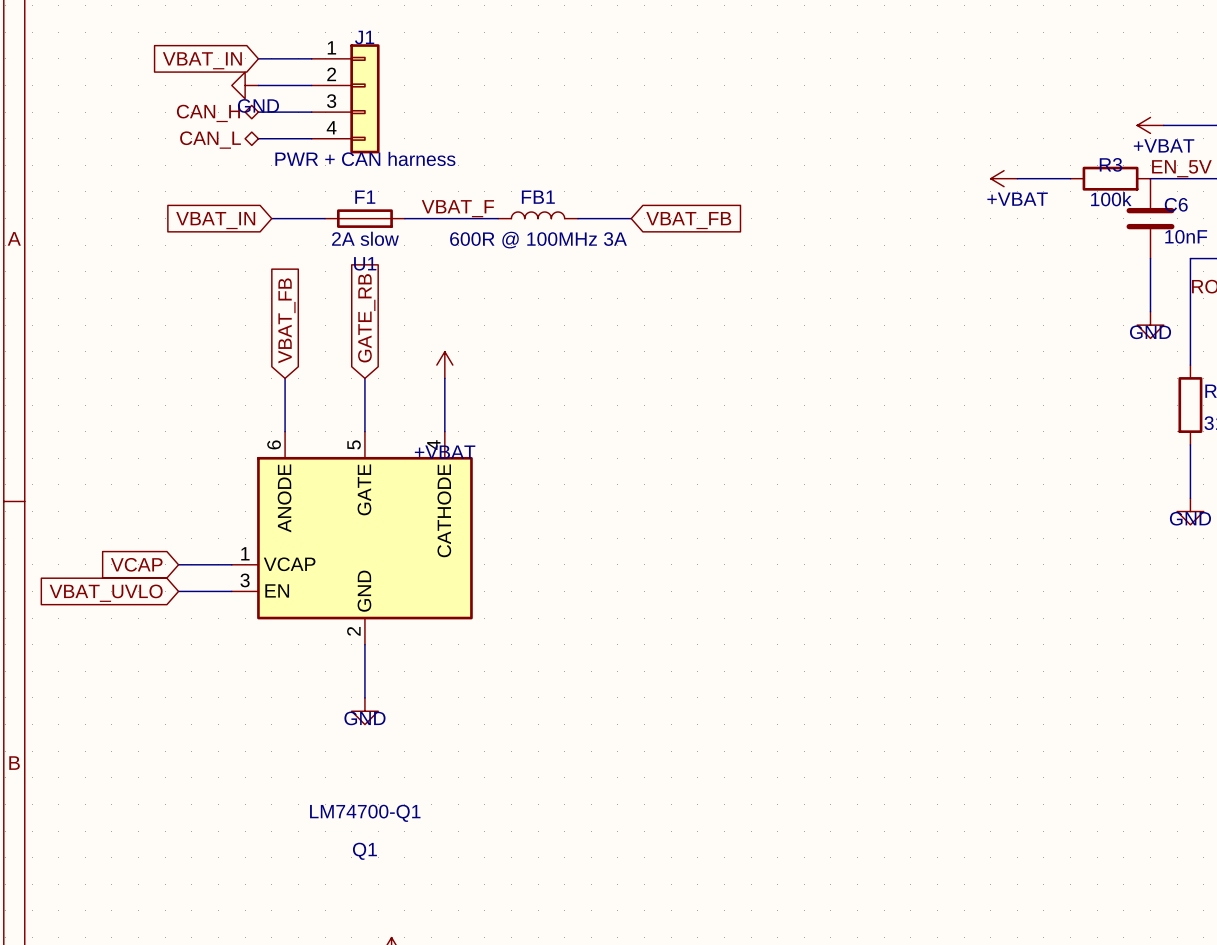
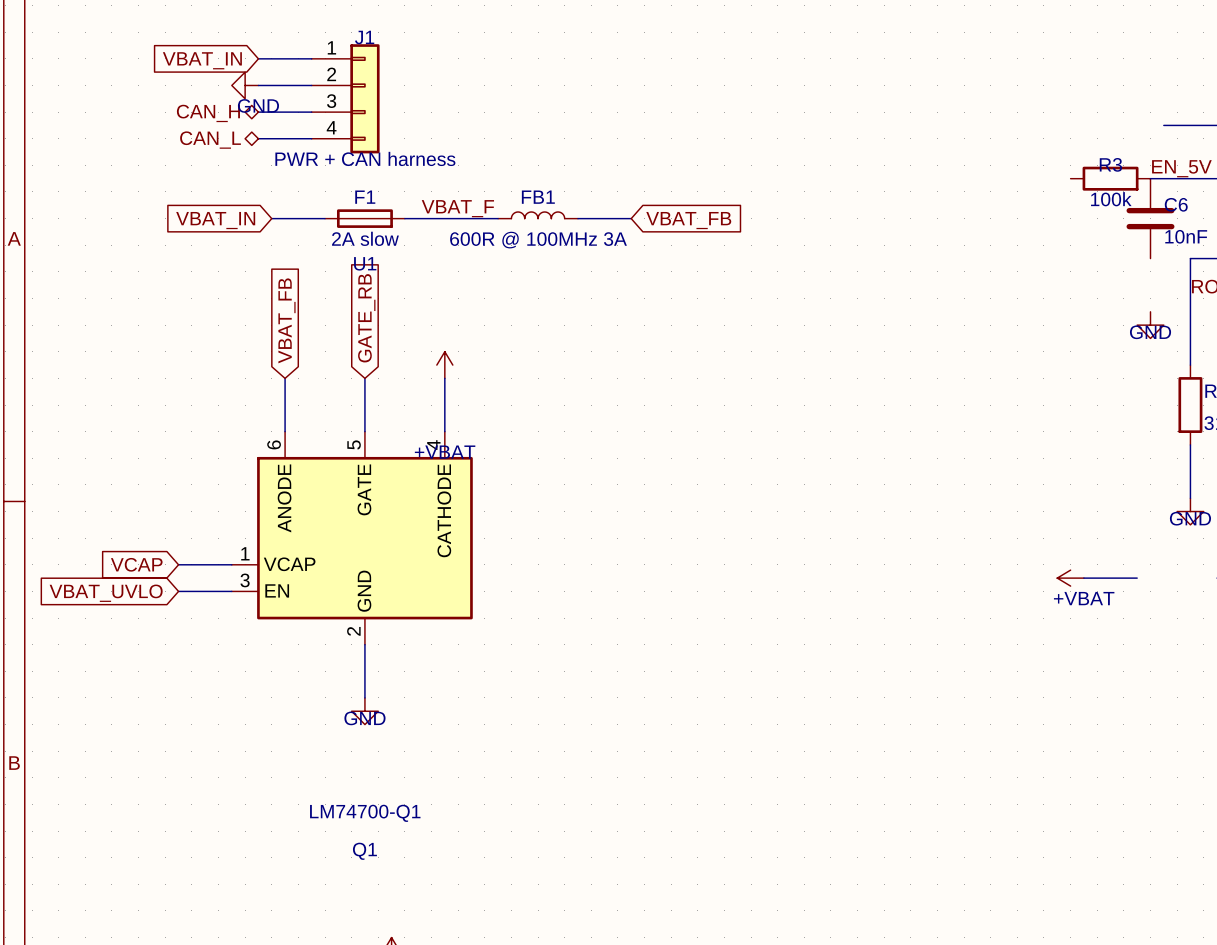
power symbol: +VBAT (1150, 125) -> none
power symbol: +VBAT (1004, 178) -> none
wire: (1017, 178) (1070, 178) -> none
wire: (1150, 258) (1150, 311) -> none
power symbol: none -> +VBAT (1070, 578)
wire: none -> (1083, 578) (1137, 578)

